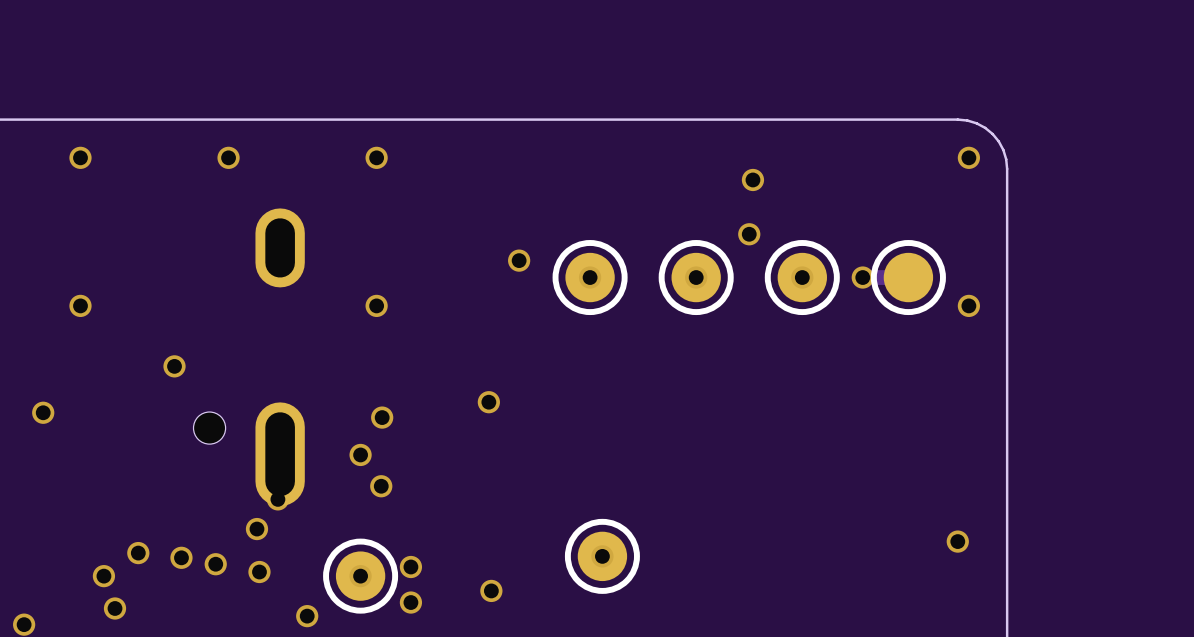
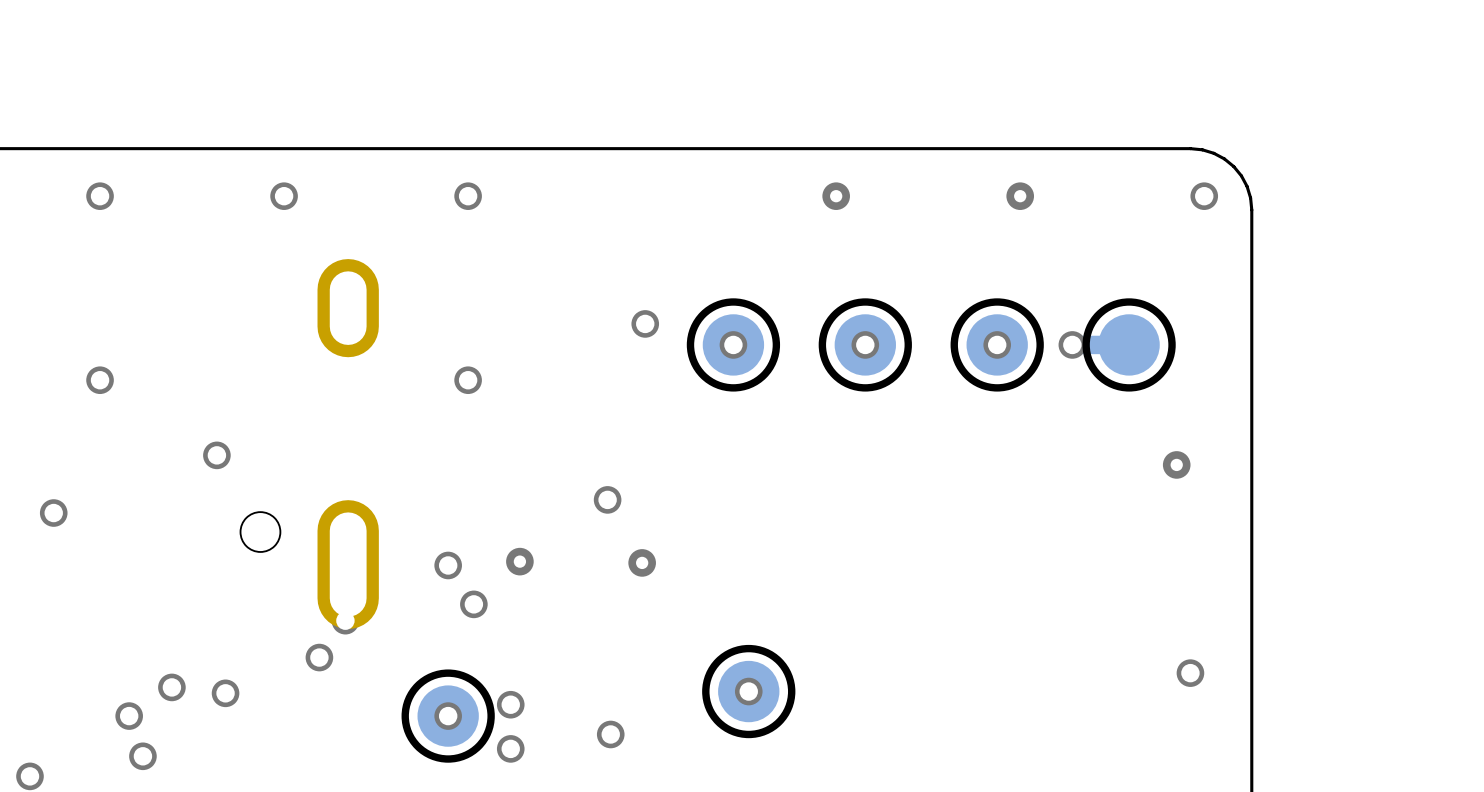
via: none -> (836, 196)
via: none -> (1020, 196)
via: (752, 179) -> none
via: (749, 234) -> none
via: (968, 305) -> none
via: none -> (1176, 464)
via: (382, 417) -> none
via: none -> (519, 561)
via: none -> (642, 562)
via: (215, 564) -> none
via: (259, 572) -> none
via: (307, 616) -> none

